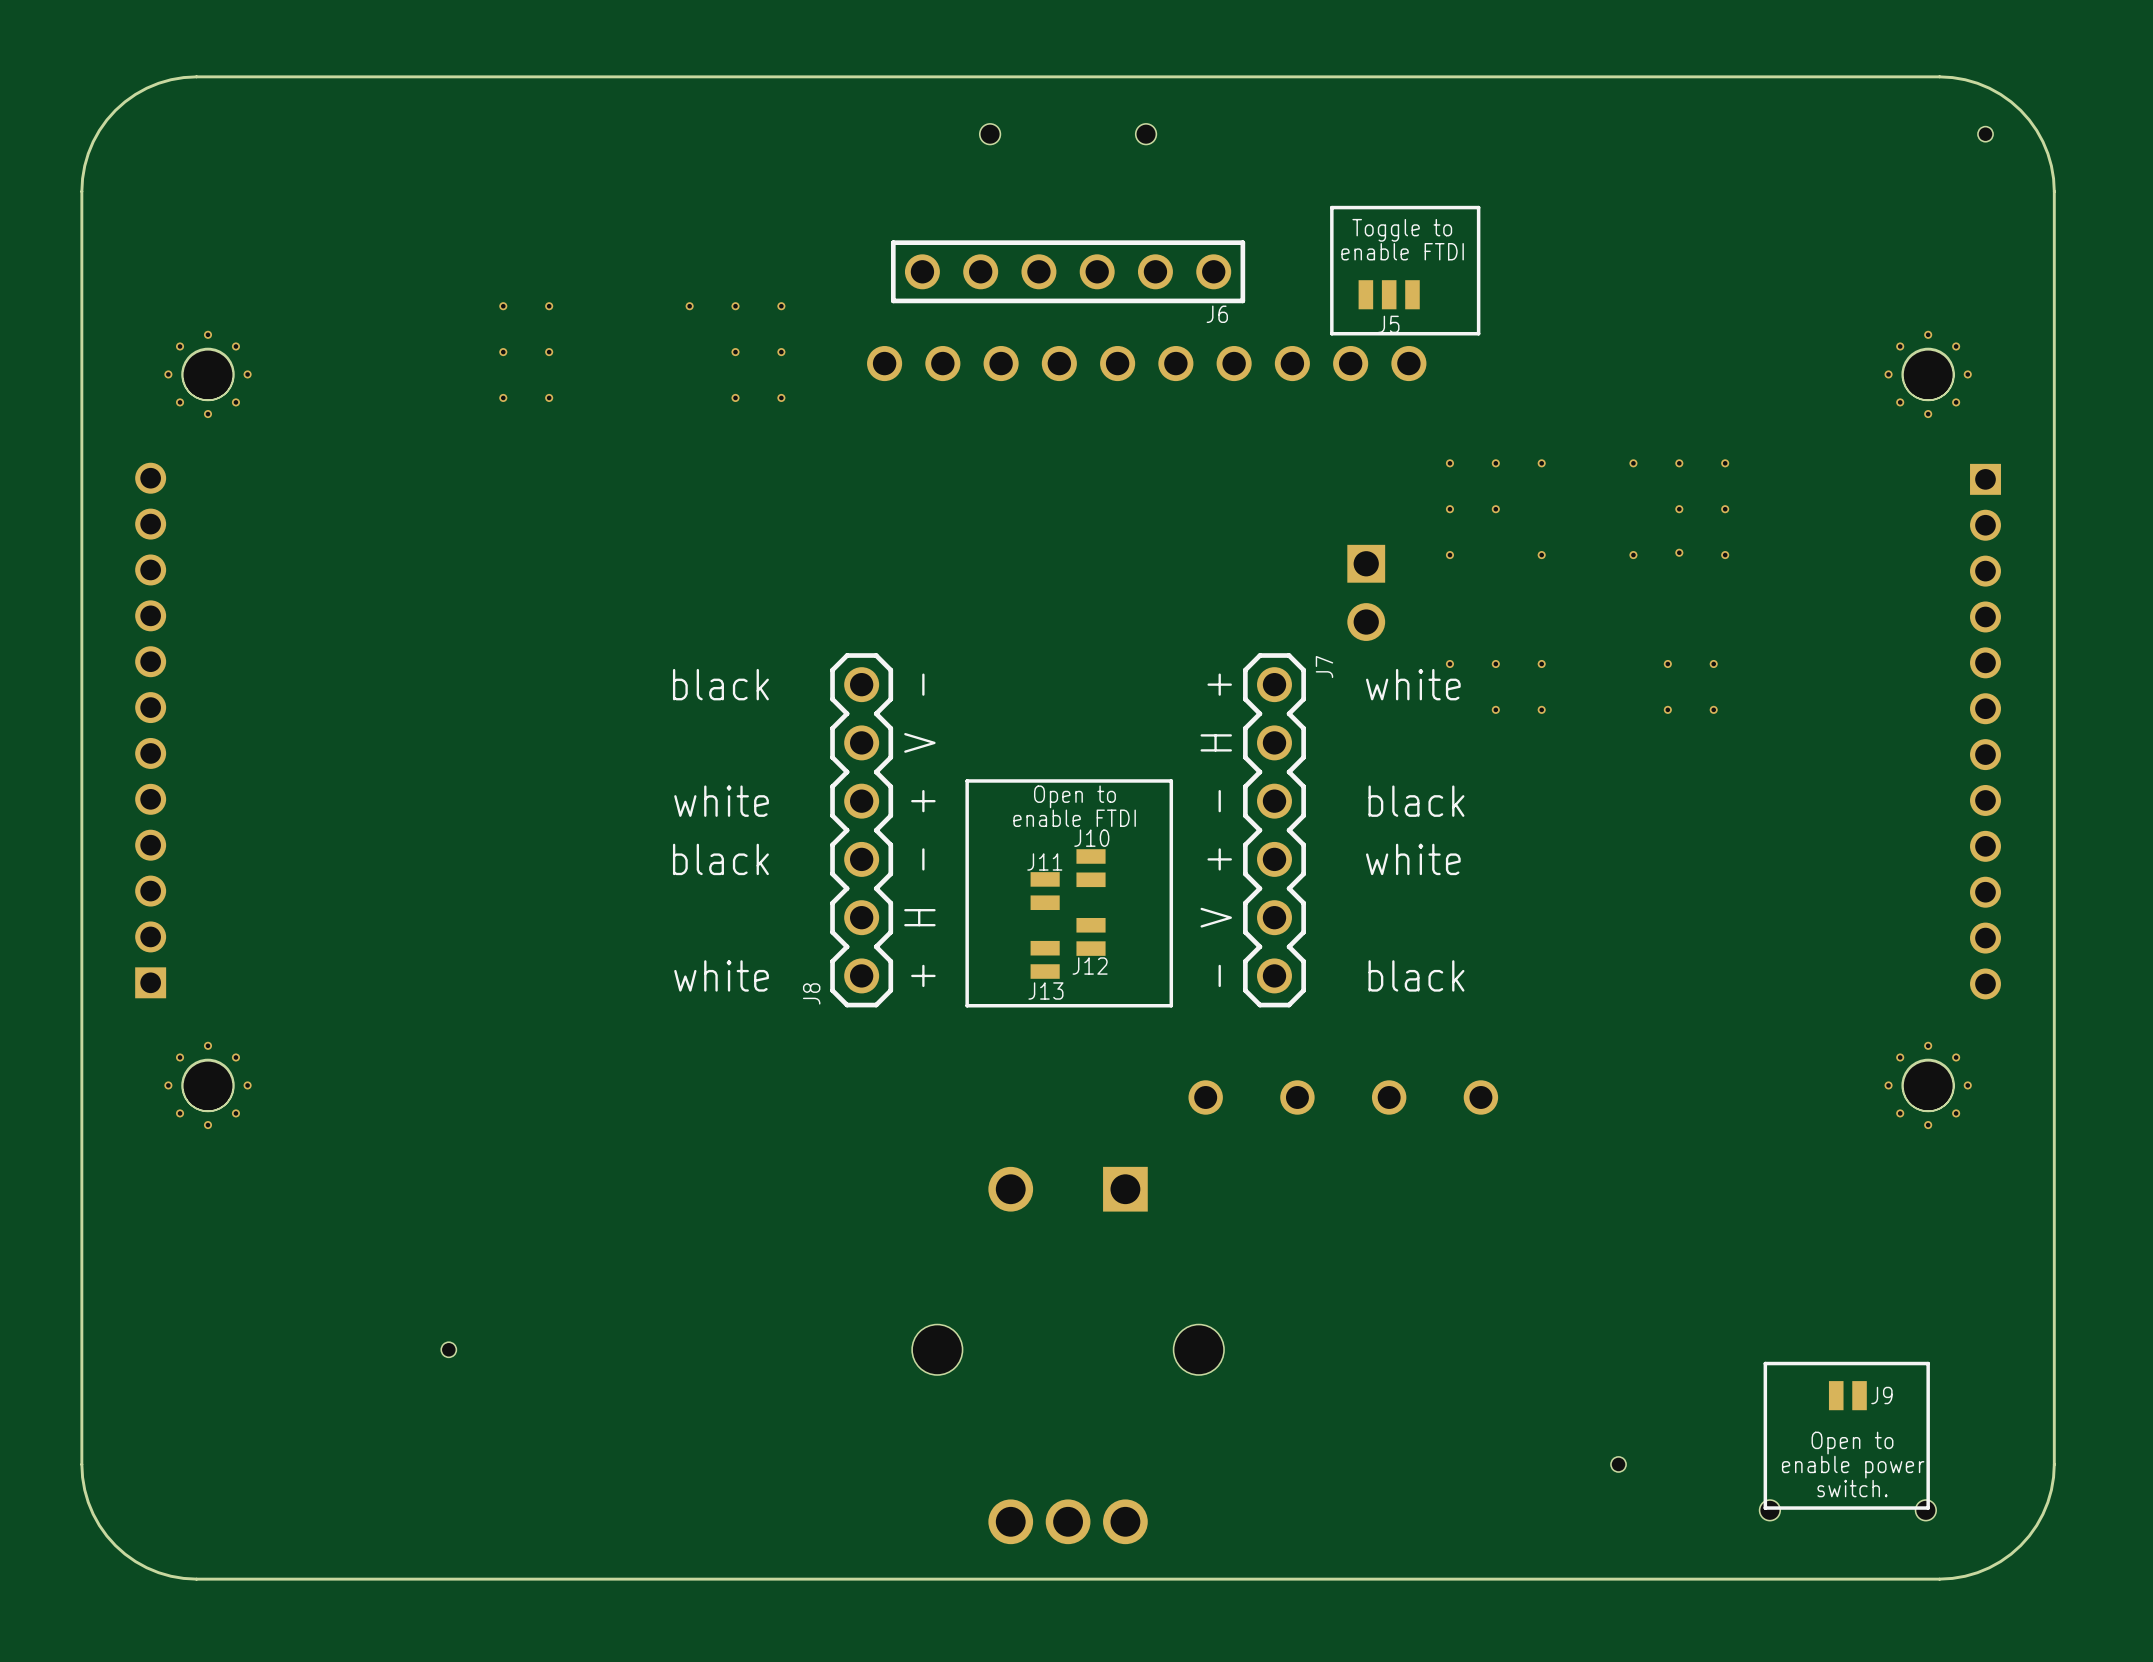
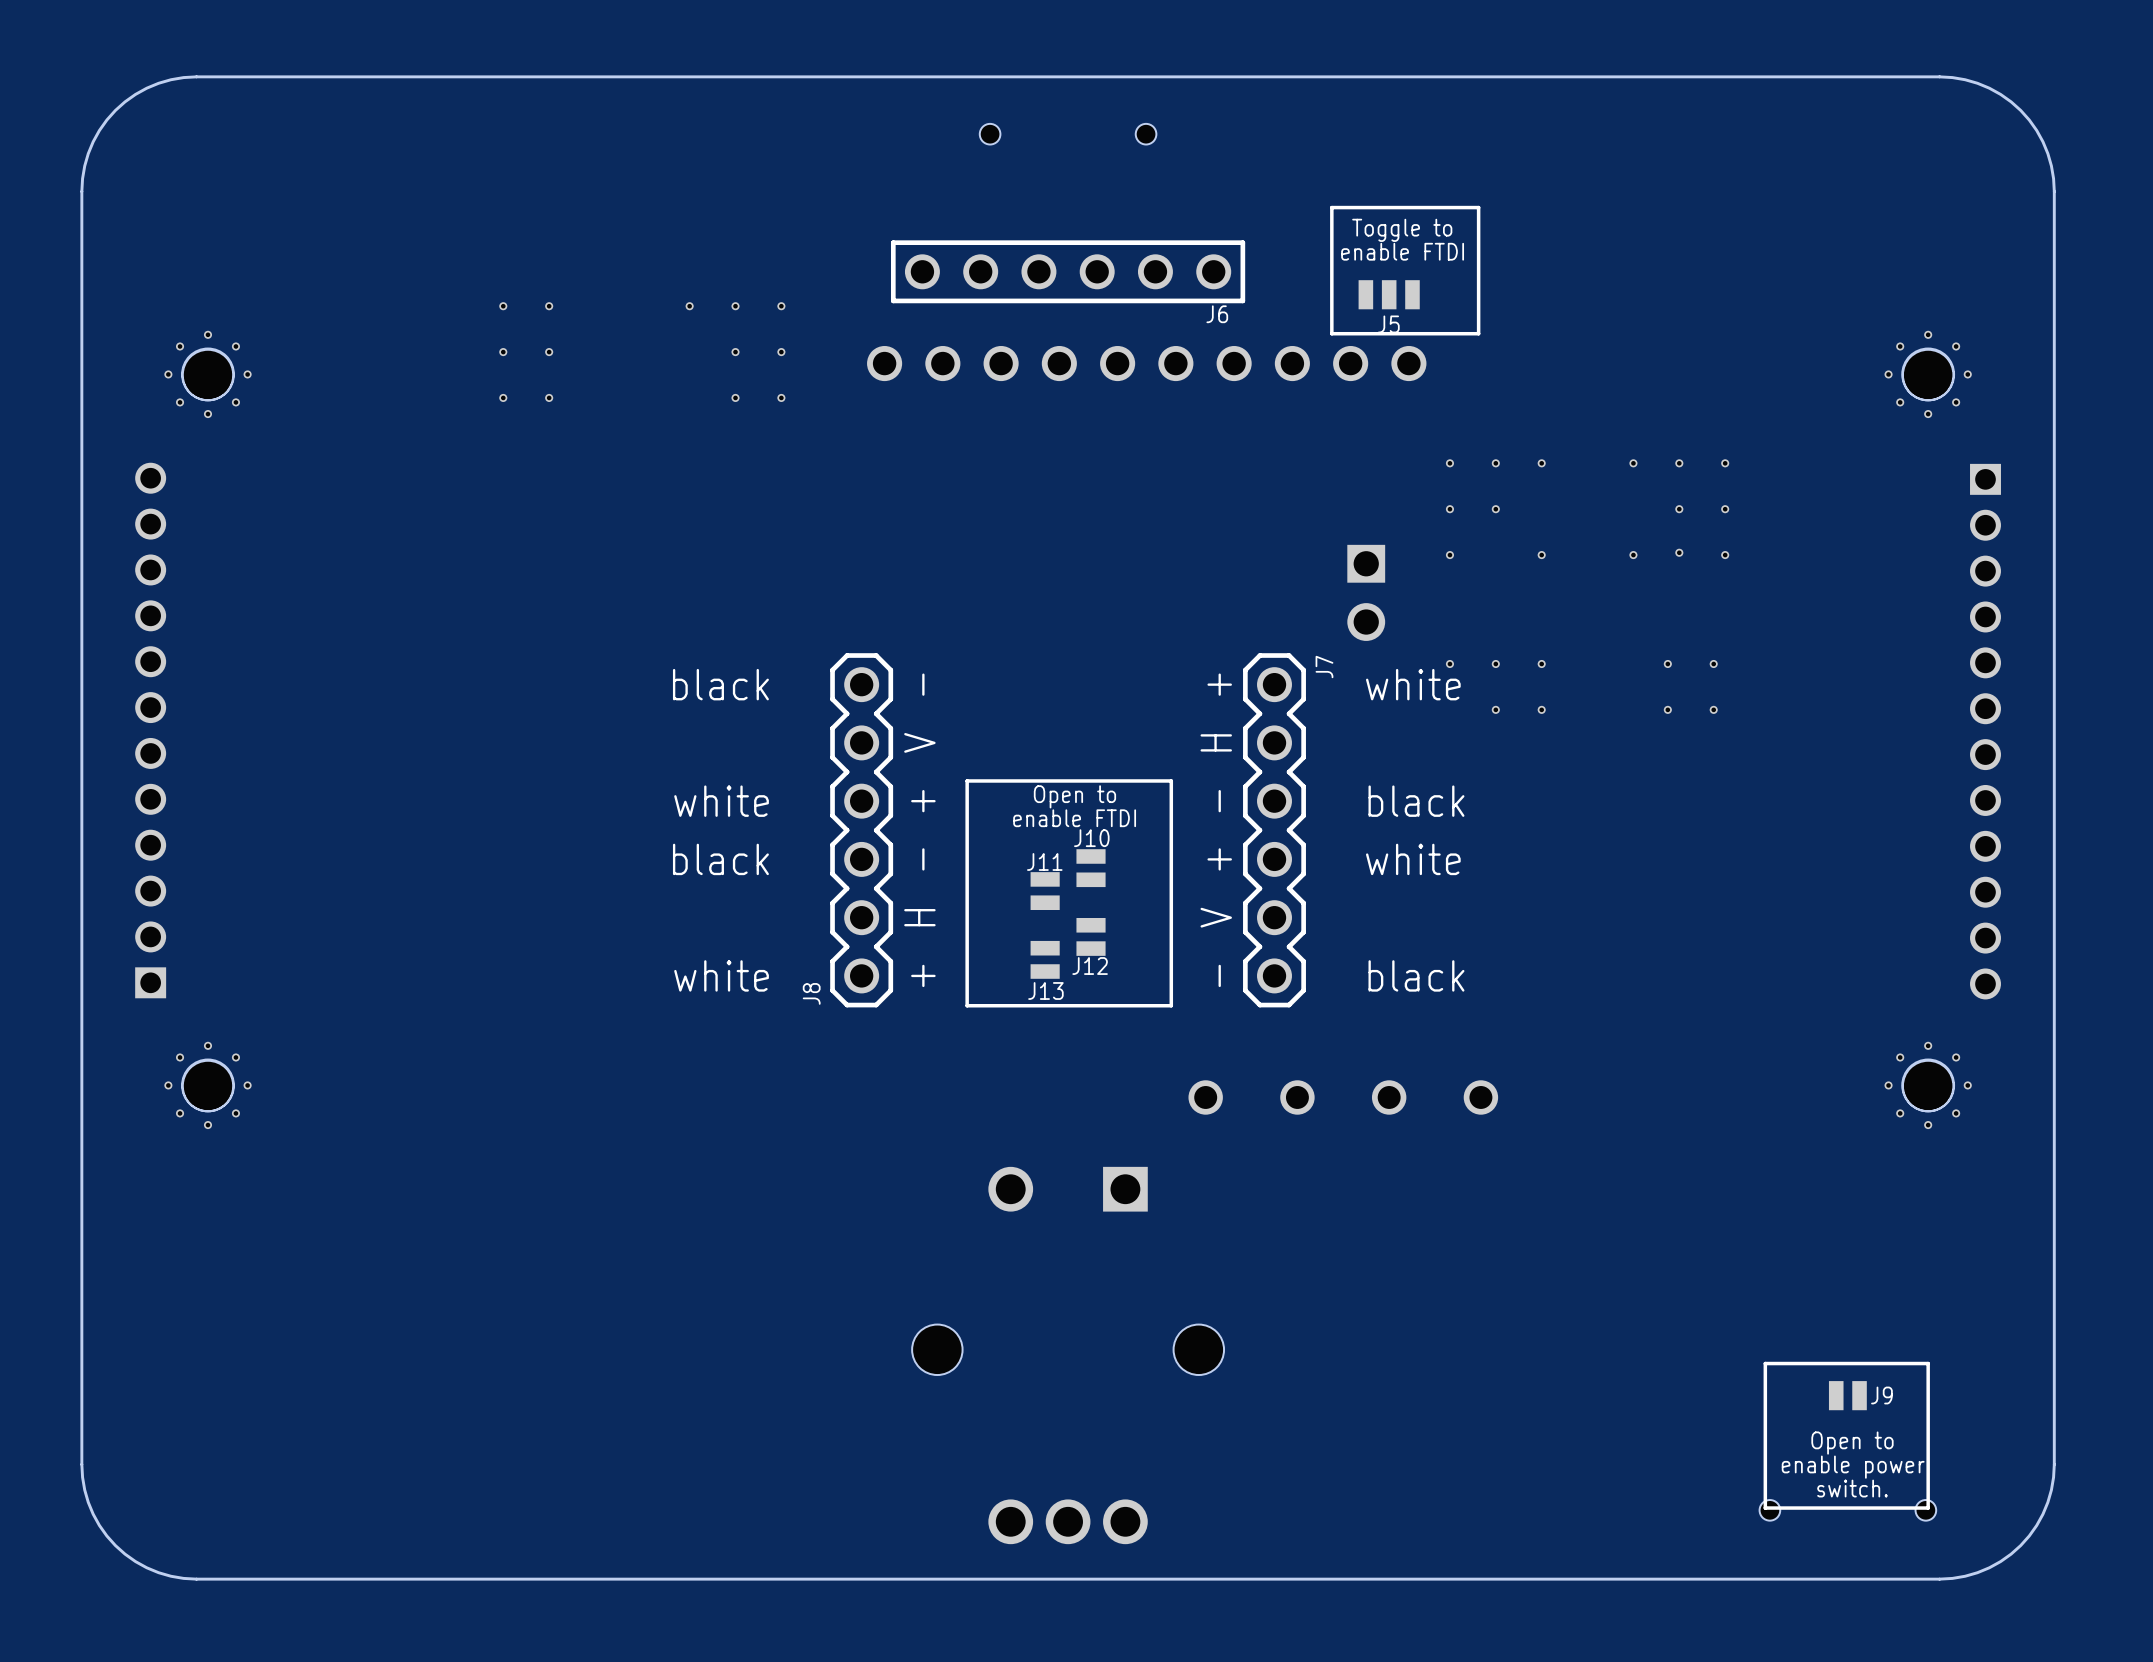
part: (1985, 134) -> none
part: (448, 1349) -> none
part: (1618, 1464) -> none

